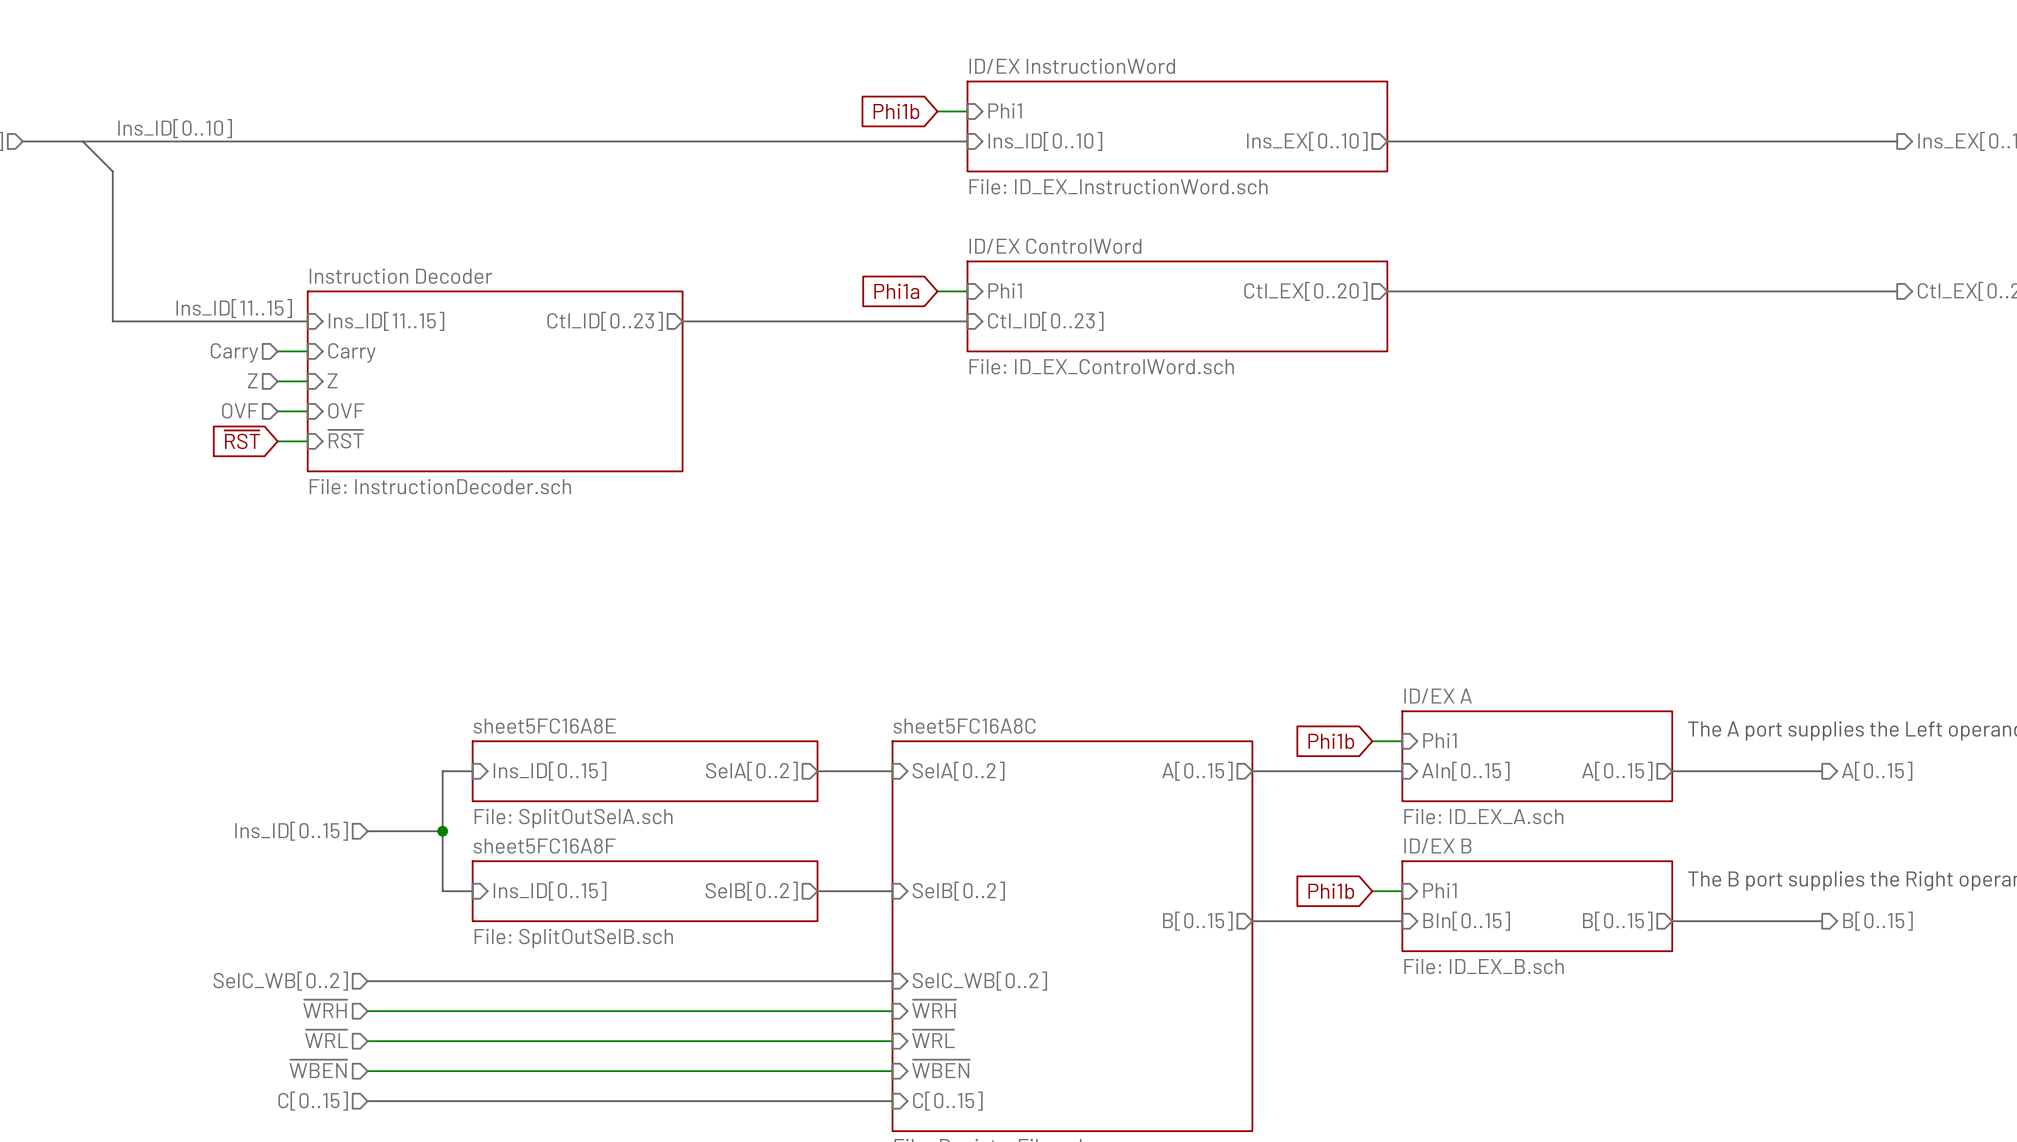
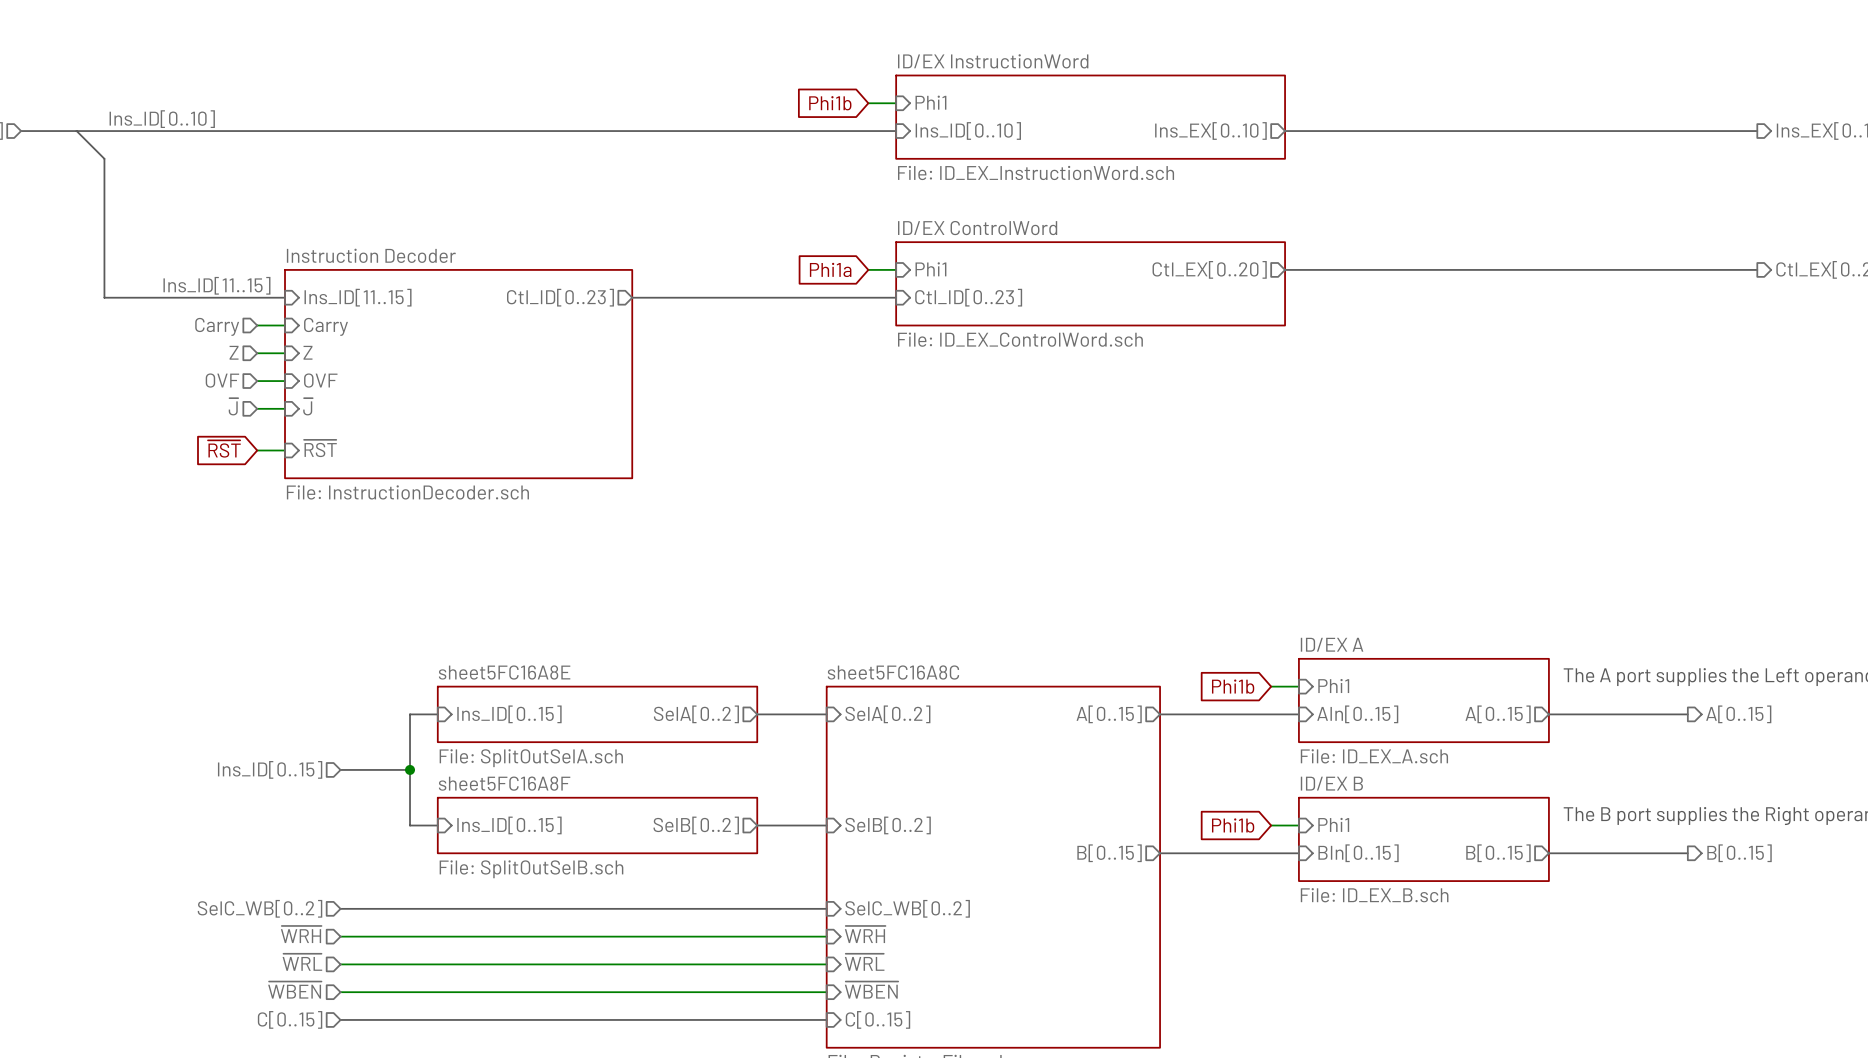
sheet Instruction Decoder: File: InstructionDecoder.sch (495, 381) -> none
sheet Instruction Decoder: none -> File: InstructionDecoder.sch (458, 374)
global label position: ~{RST} (242, 439) -> ~{RST} (224, 448)
hierarchical label: none -> ~{J} (233, 406)
sheet pin: ~{RST} (345, 439) -> ~{J} (307, 406)
sheet pin: none -> ~{RST} (320, 448)
wire: none -> (257, 450) (285, 450)

